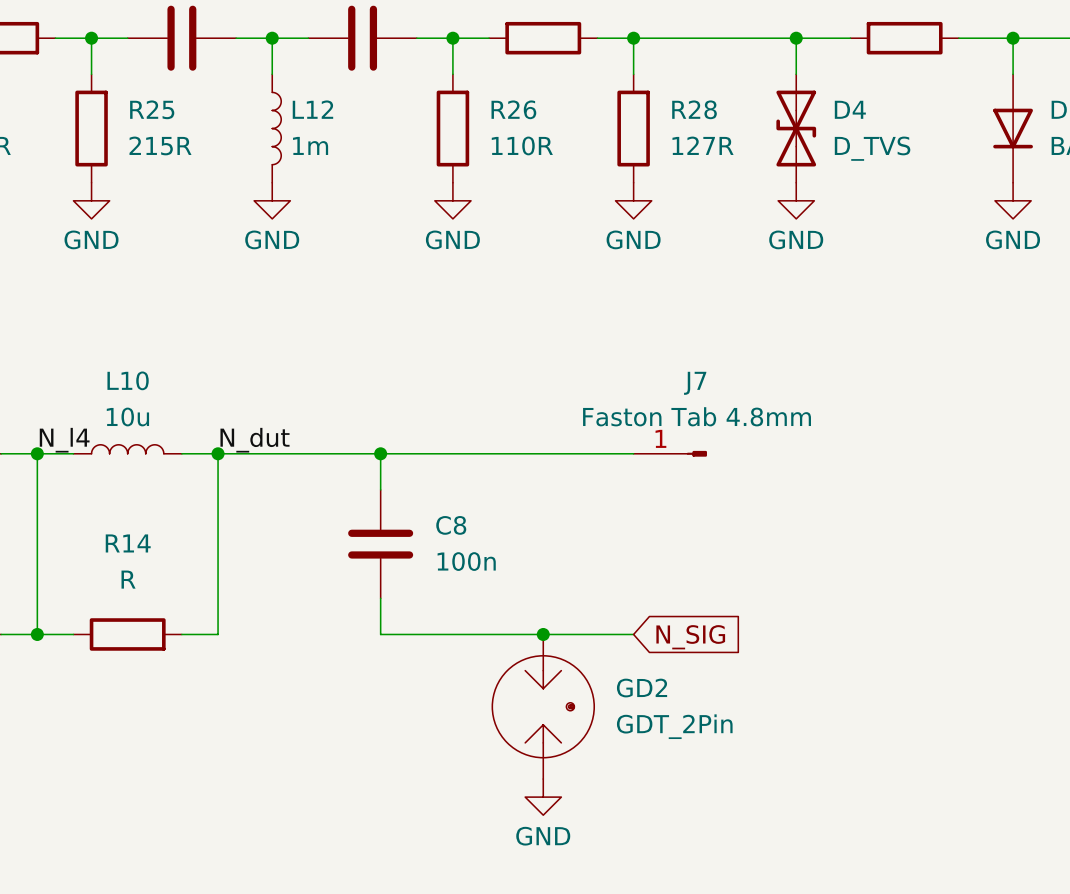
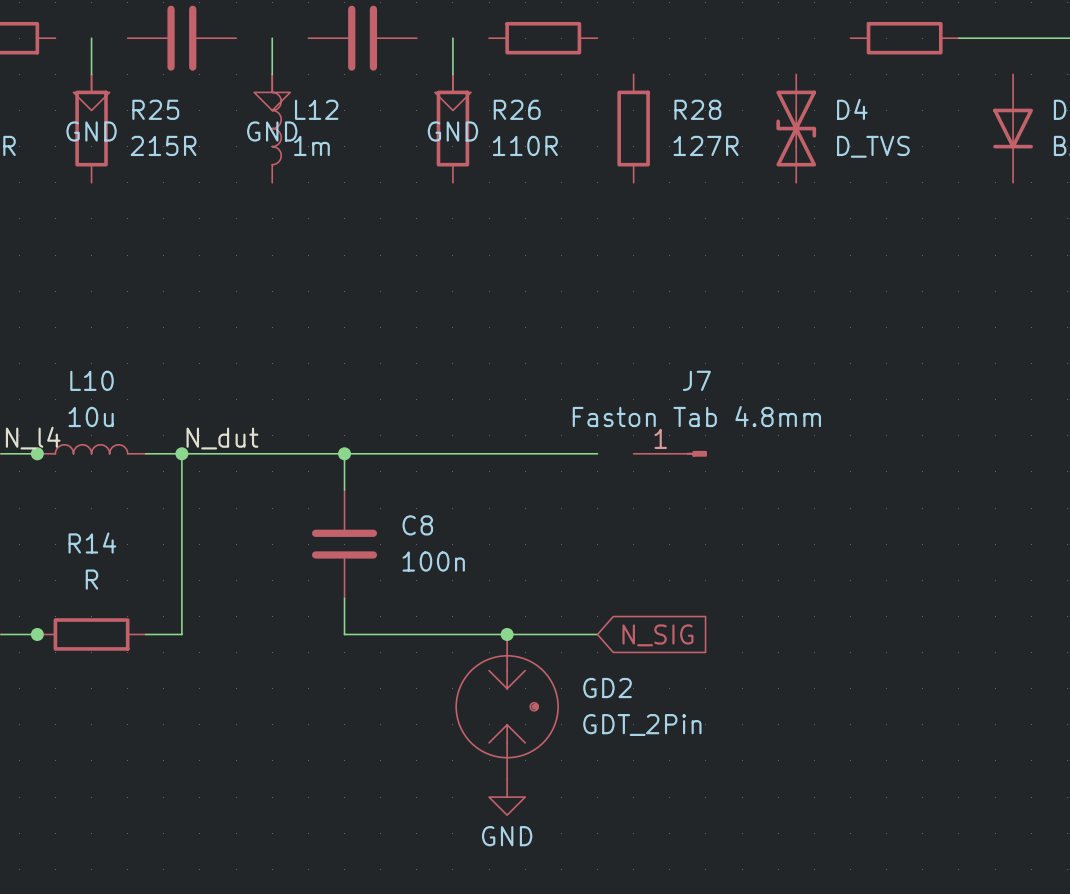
wire: (55, 38) (127, 38) -> none
junction: (91, 38) -> none
wire: (236, 38) (308, 38) -> none
junction: (272, 38) -> none
wire: (416, 38) (489, 38) -> none
junction: (452, 38) -> none
wire: (597, 38) (850, 38) -> none
wire: (633, 38) (633, 74) -> none
junction: (633, 38) -> none
wire: (796, 38) (796, 74) -> none
junction: (796, 38) -> none
wire: (1013, 38) (1013, 74) -> none
junction: (1013, 38) -> none
power symbol: none -> GND (91, 92)
power symbol: none -> GND (272, 92)
power symbol: none -> GND (452, 92)
power symbol: GND (91, 200) -> none
power symbol: GND (272, 200) -> none
power symbol: GND (452, 200) -> none
power symbol: GND (633, 200) -> none
power symbol: GND (796, 200) -> none
power symbol: GND (1013, 200) -> none
label position: N_l4 (64, 440) -> N_l4 (33, 438)
label position: N_dut (255, 440) -> N_dut (222, 438)
L10 position: (127, 449) -> (91, 449)
wire: (73, 453) (37, 453) (37, 634) (73, 634) -> none
wire: none -> (145, 453) (181, 453) (181, 634) (145, 634)
wire: (218, 453) (218, 634) (181, 634) -> none
junction position: (218, 453) -> (181, 453)
wire: (380, 453) (380, 489) -> (344, 453) (344, 489)
junction position: (380, 453) -> (344, 453)
wire: (597, 453) (633, 453) -> none
C8 position: (380, 544) -> (344, 544)
wire: (380, 598) (380, 634) -> (344, 598) (344, 634) (380, 634)
R14 position: (127, 634) -> (91, 634)
junction position: (543, 634) -> (507, 634)
wire: (597, 634) (633, 634) -> none
global label position: N_SIG (690, 637) -> N_SIG (657, 635)
GD2 position: (543, 706) -> (507, 706)
power symbol position: GND (543, 797) -> GND (507, 797)

